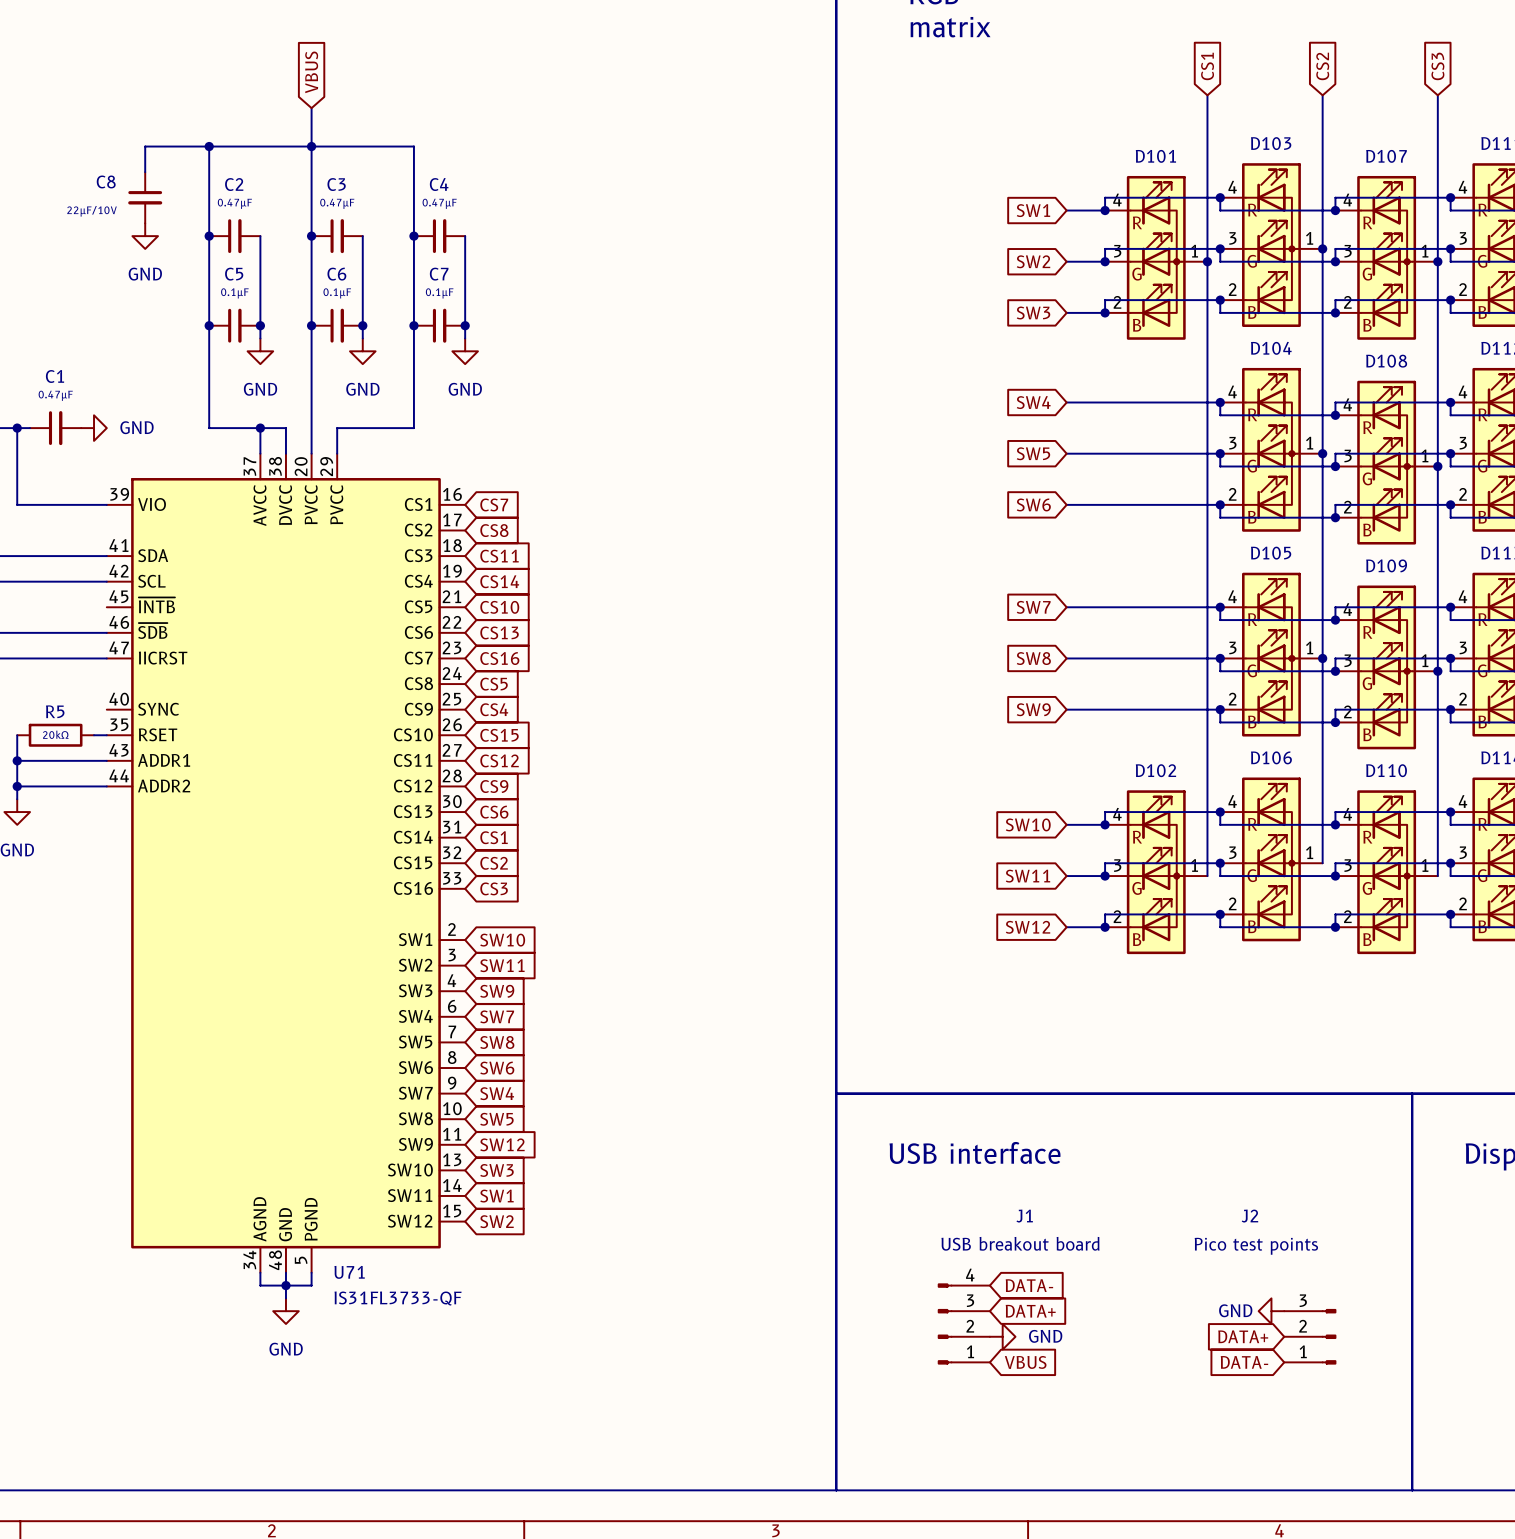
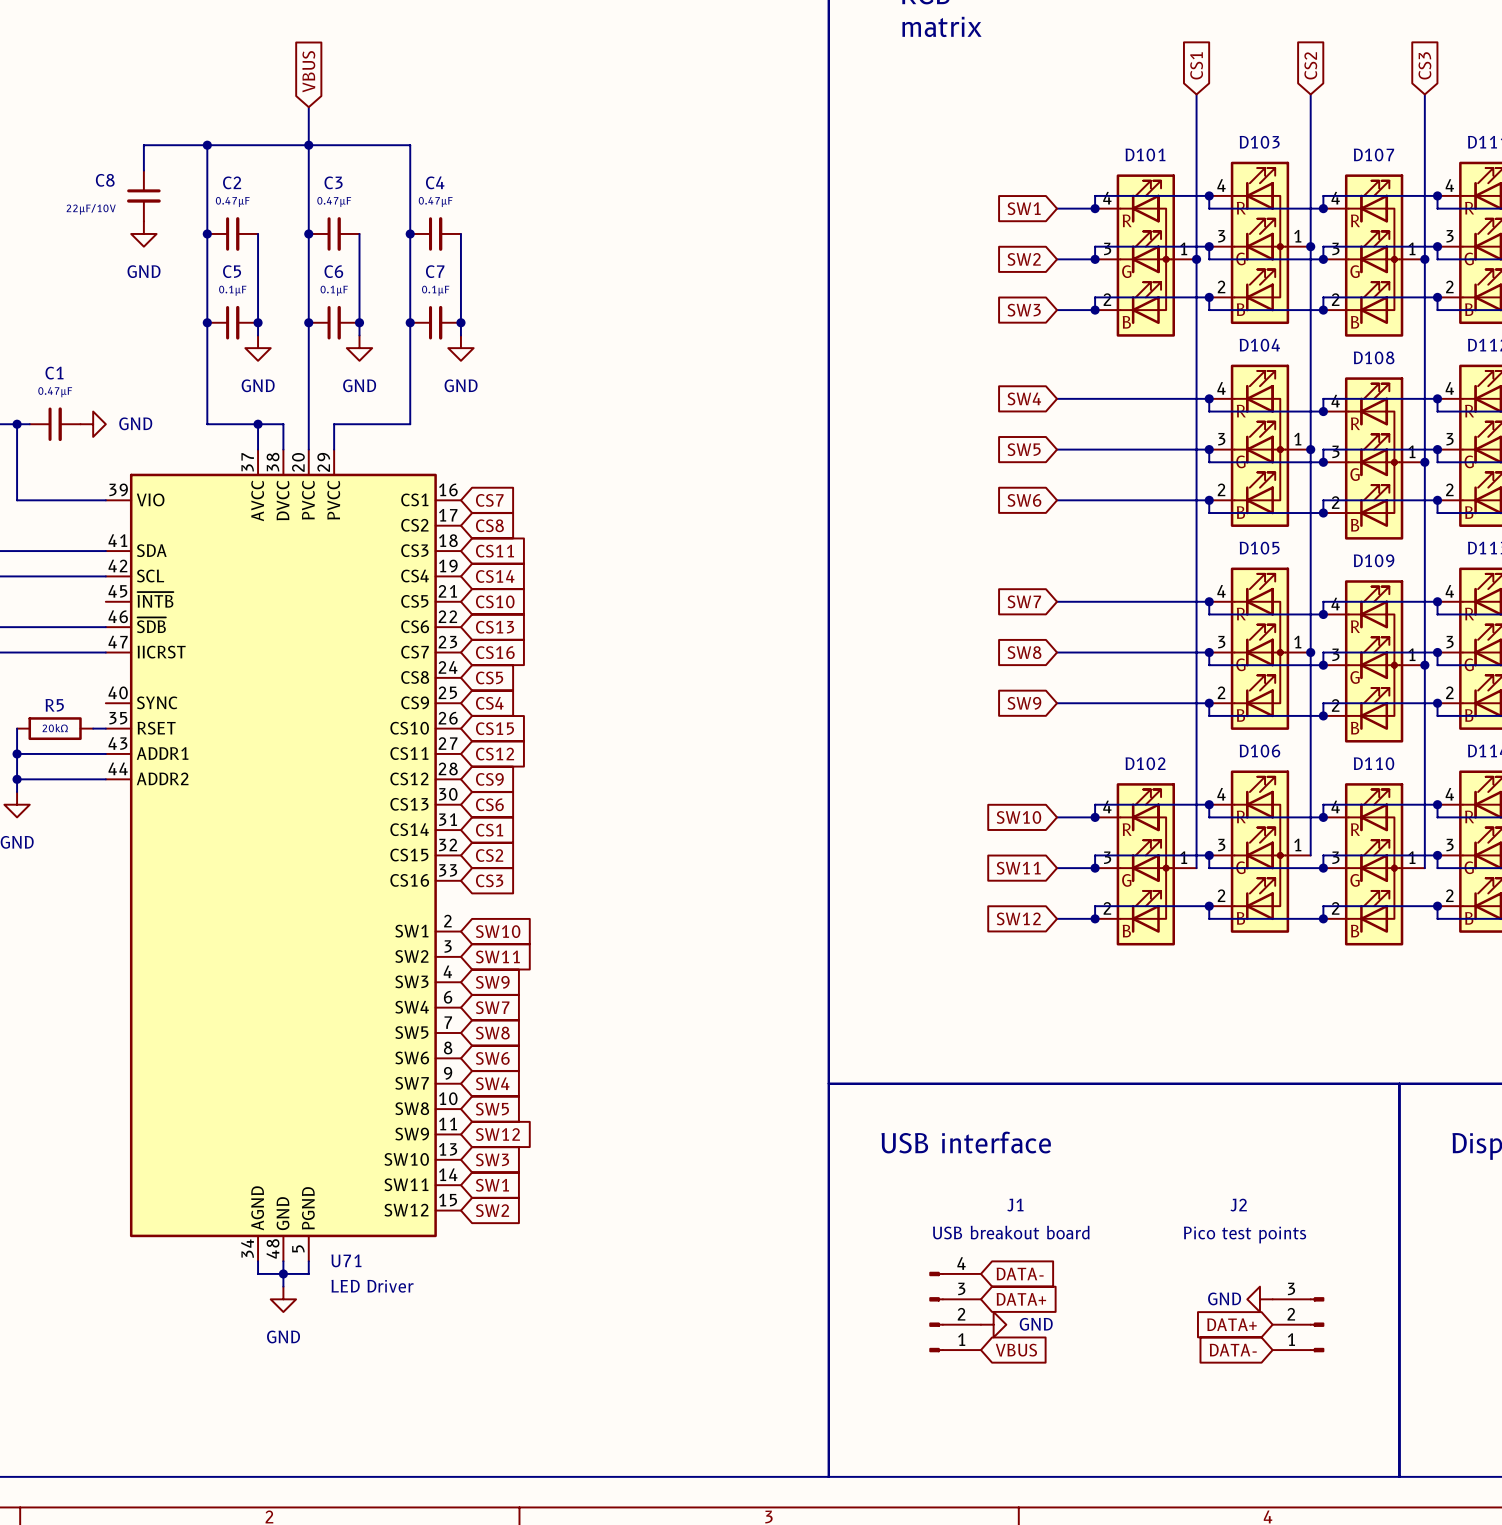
U71 value: IS31FL3733-QF (398, 1298) -> LED Driver (372, 1286)

